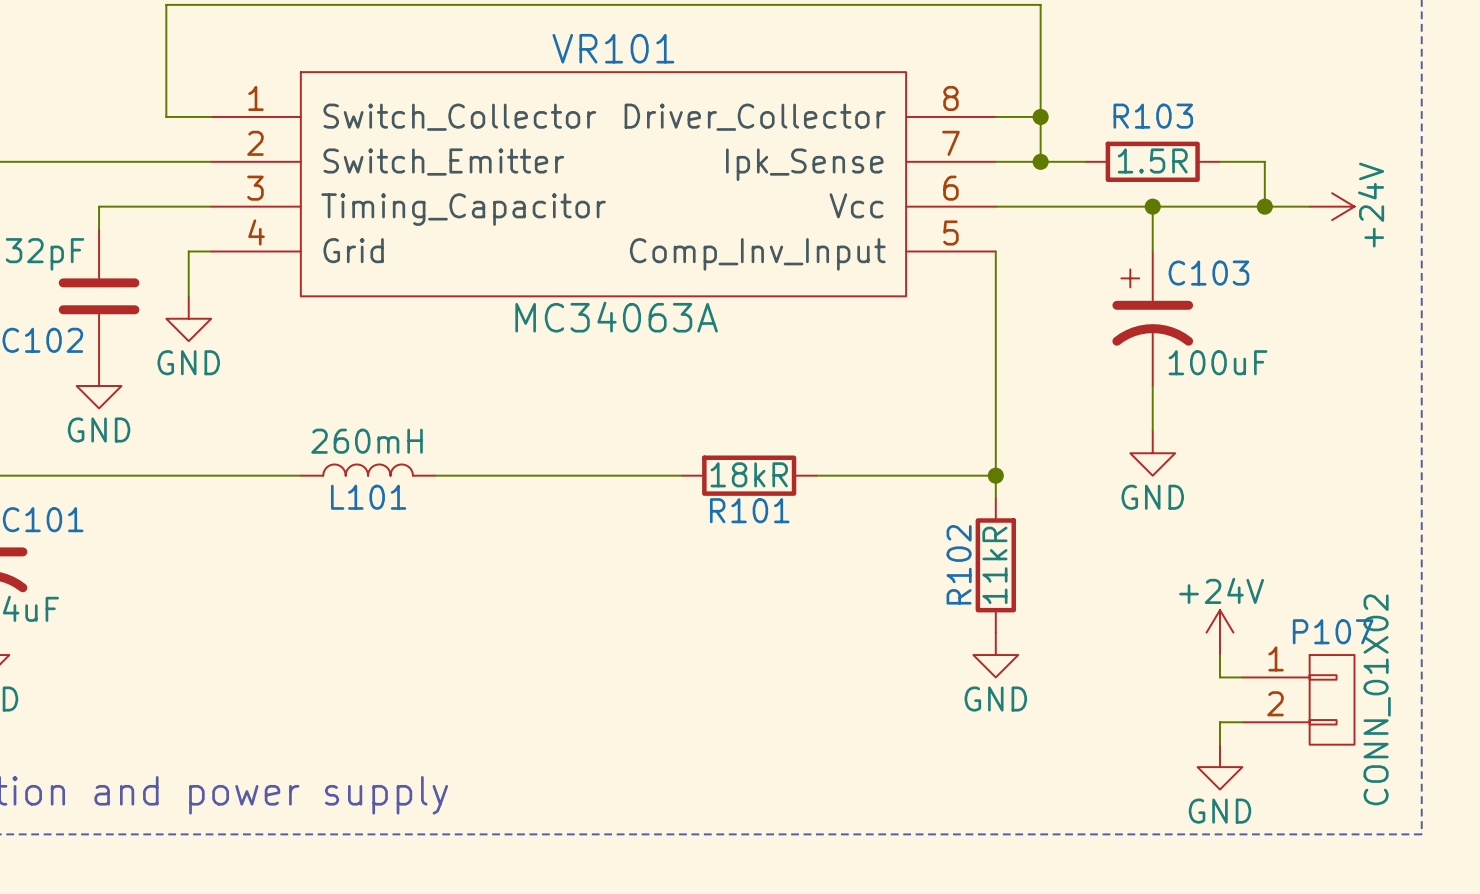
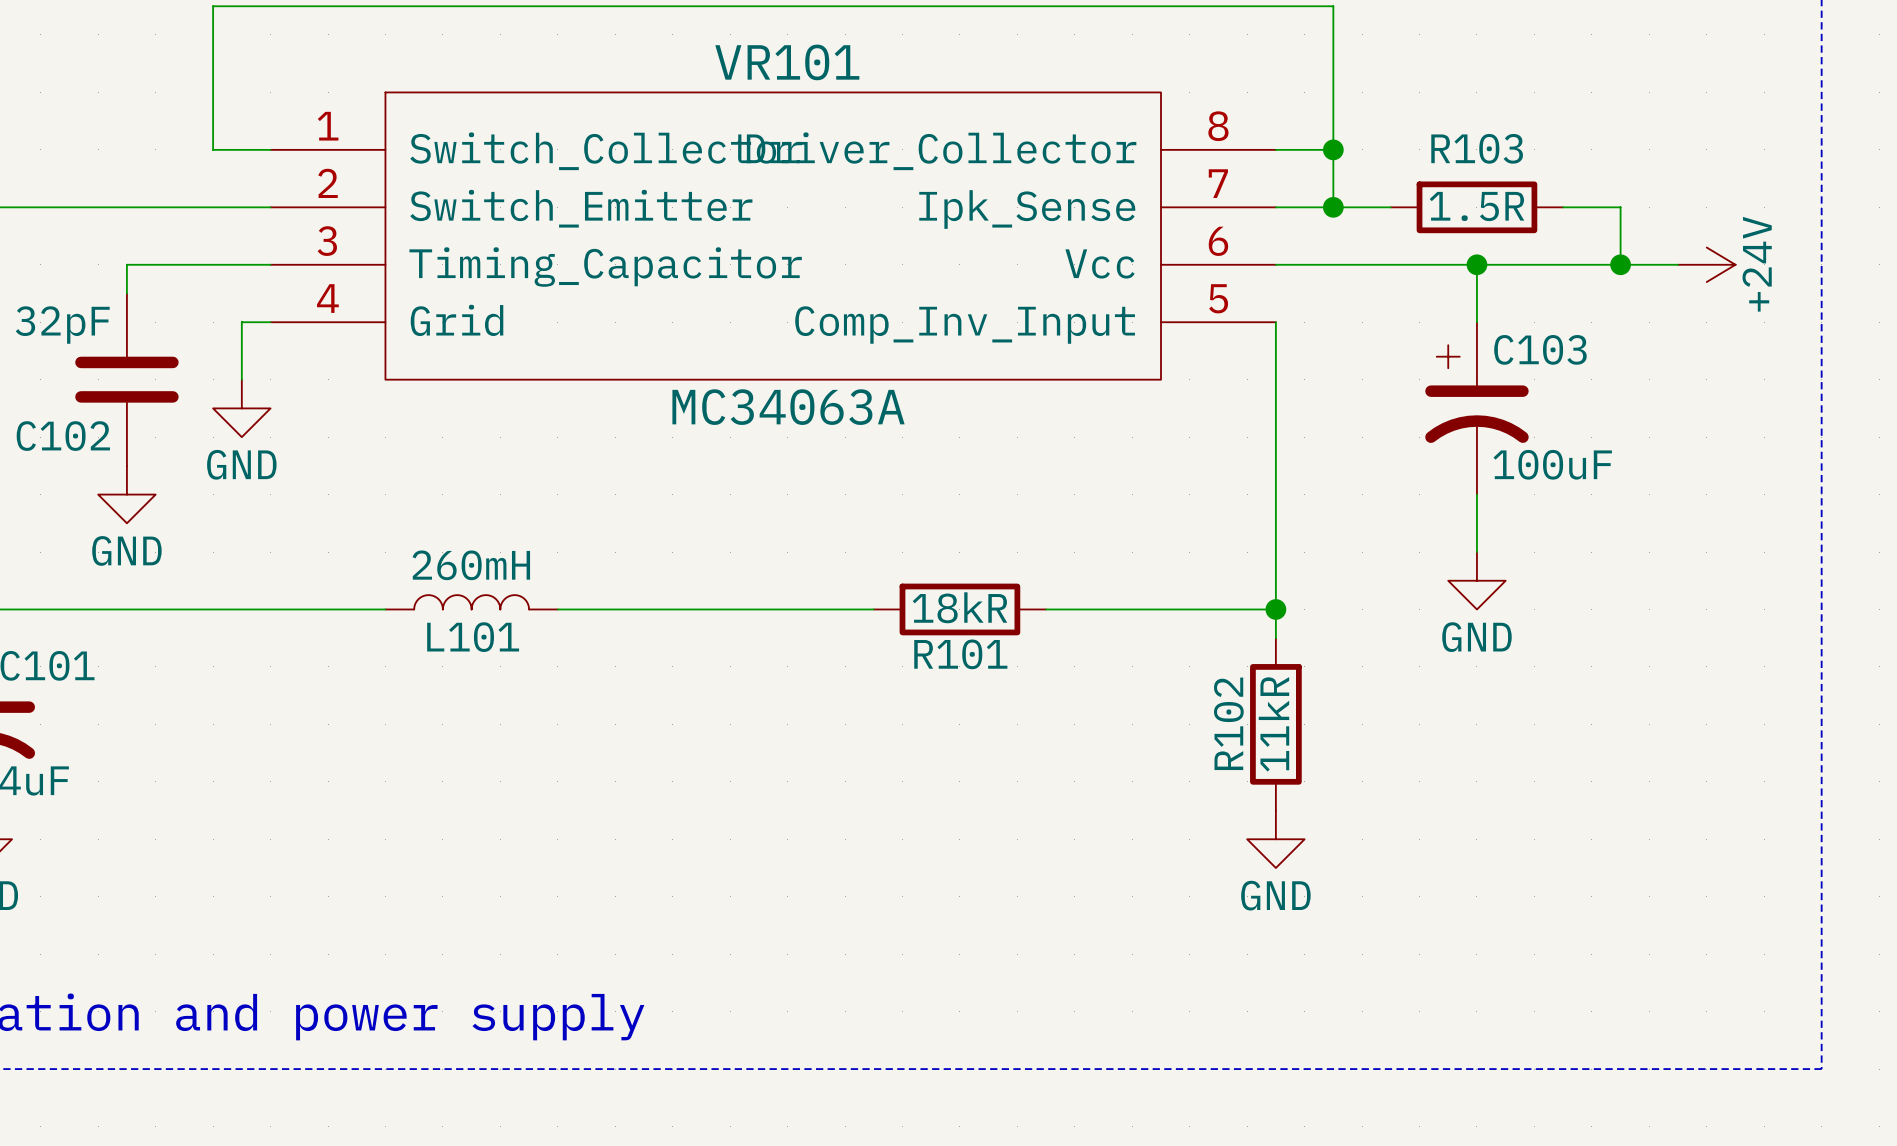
power symbol: +24V (1219, 632) -> none
wire: (1219, 655) (1219, 677) (1242, 677) -> none
P107: CONN_01X02 (1298, 699) -> none
wire: (1242, 722) (1219, 722) (1219, 744) -> none
power symbol: GND (1219, 767) -> none

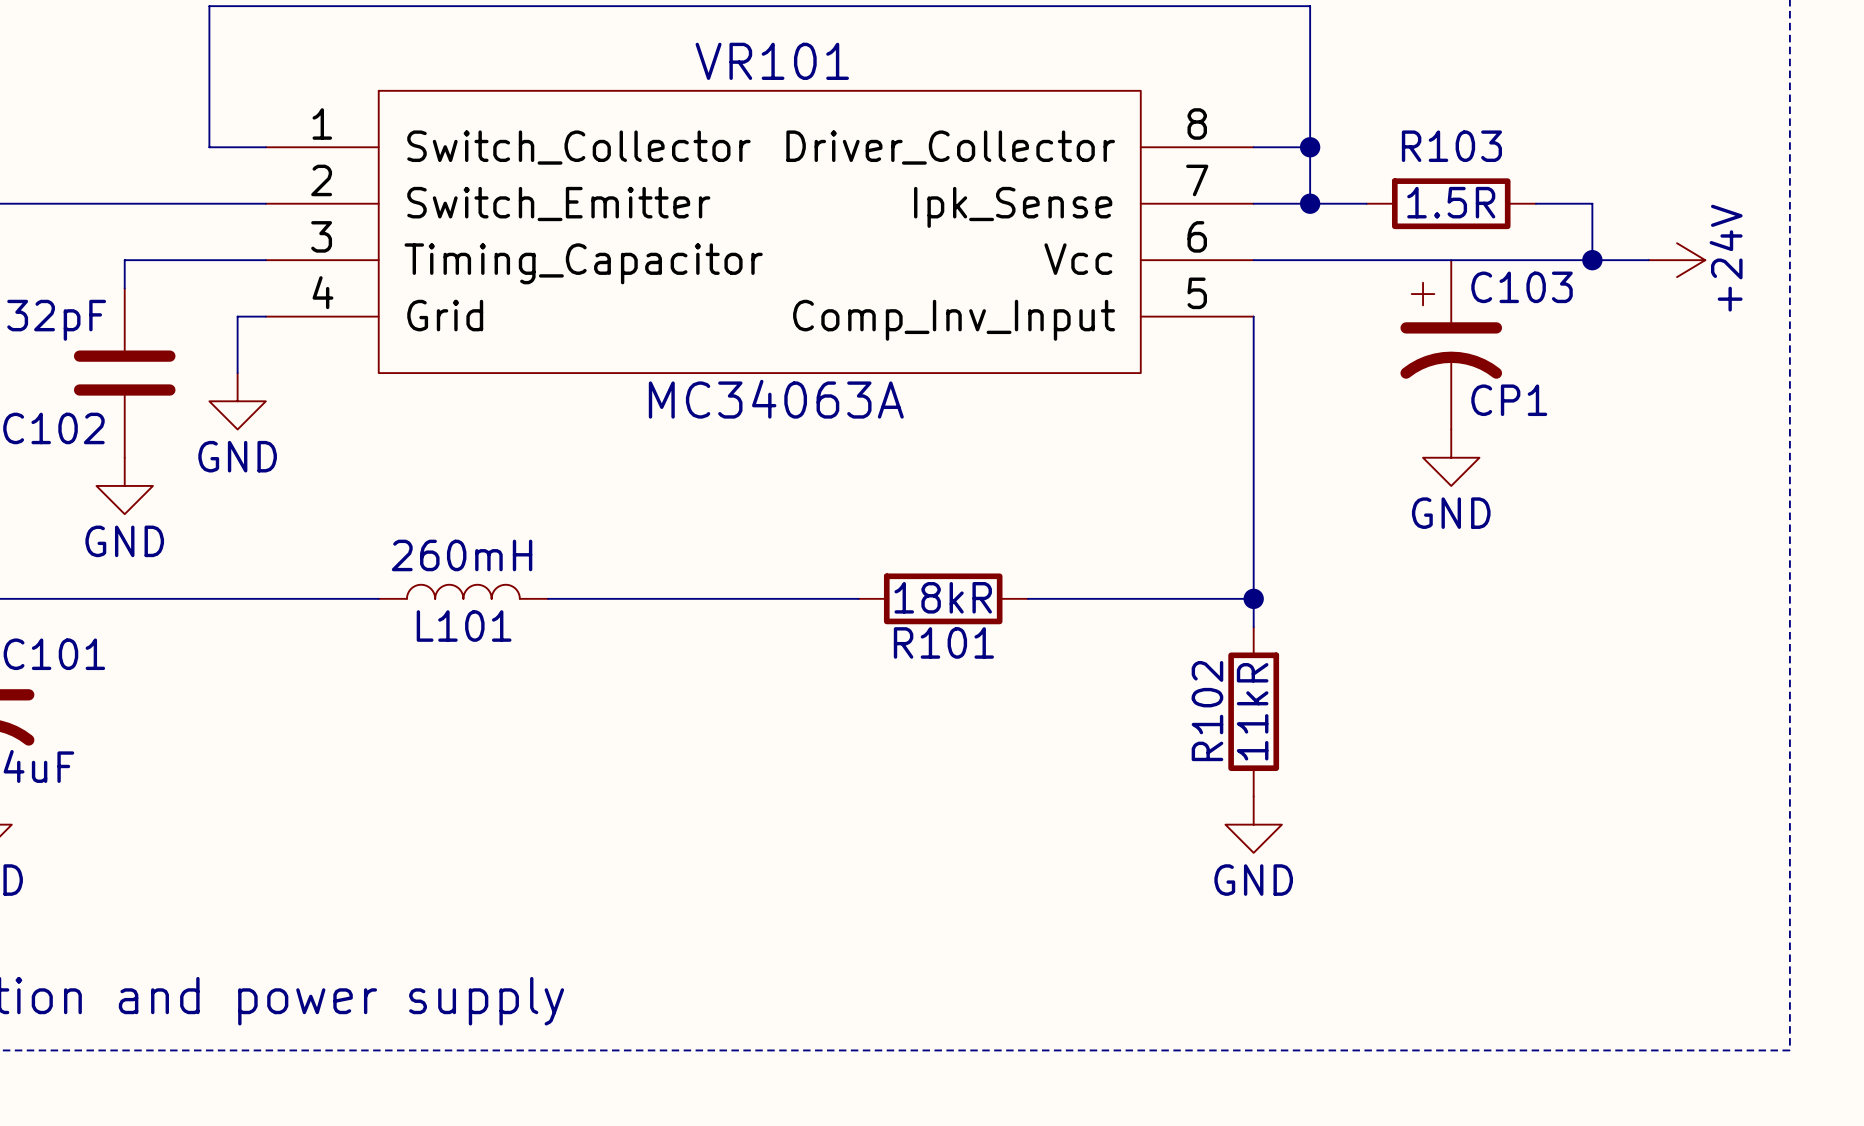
junction: (1476, 264) -> none
C103 position: (1476, 408) -> (1451, 344)
C103 value: 100uF (1552, 464) -> CP1 (1509, 400)
wire: (1476, 494) (1476, 552) -> none
power symbol position: GND (1476, 580) -> GND (1451, 457)

